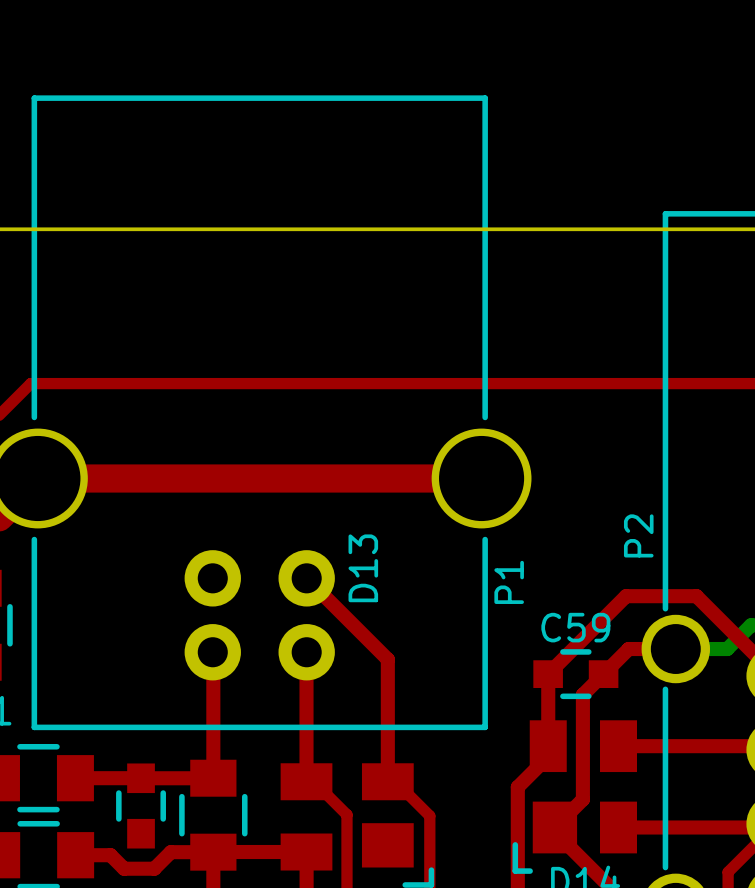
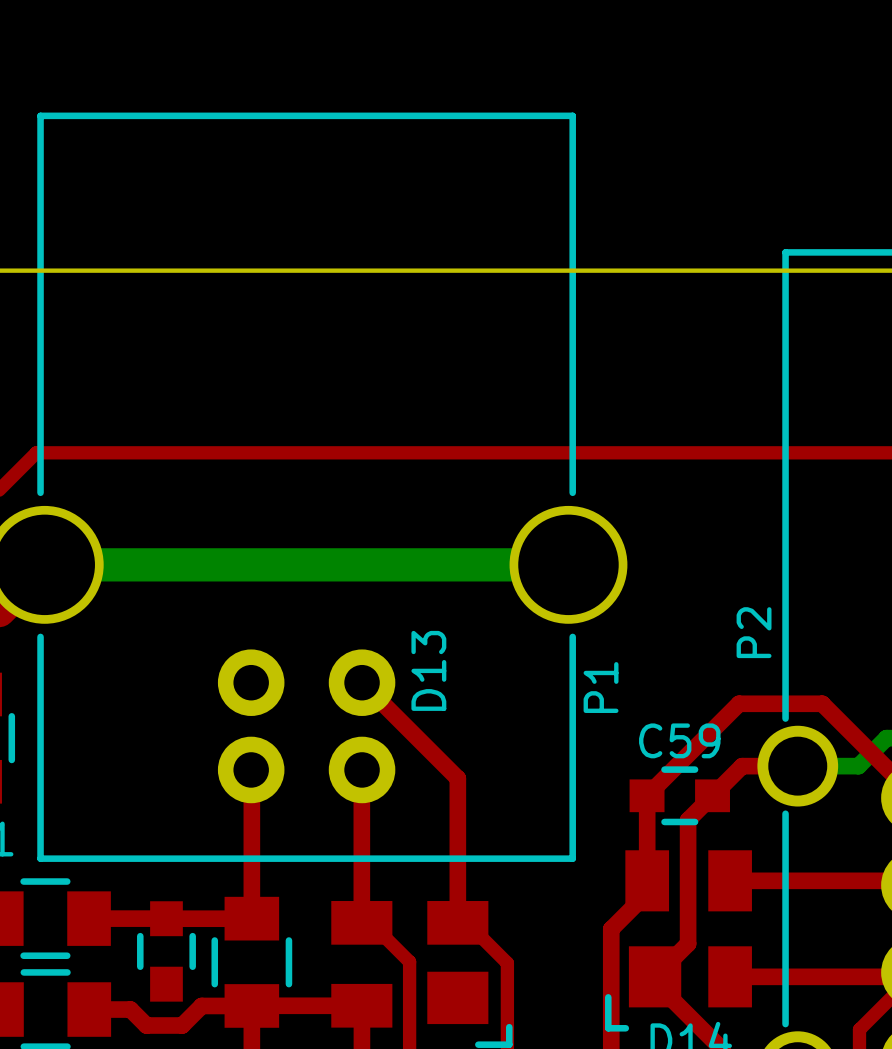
top track: (37, 478) (481, 478) -> none
bottom track: none -> (44, 564) (568, 564)

